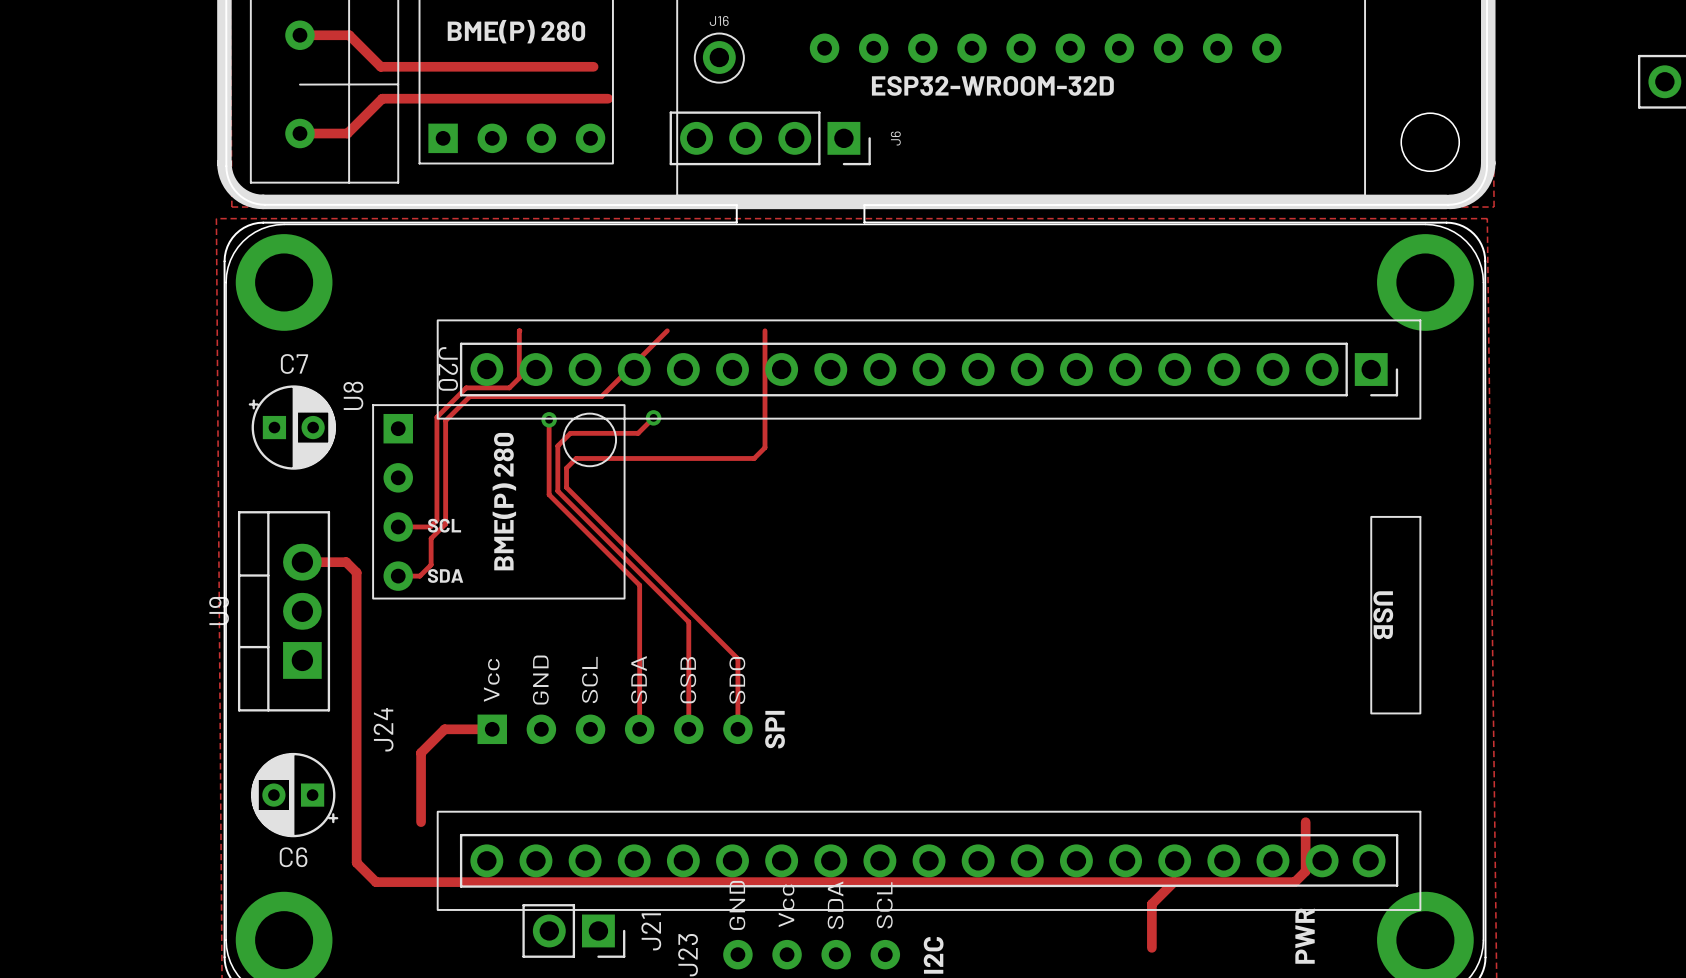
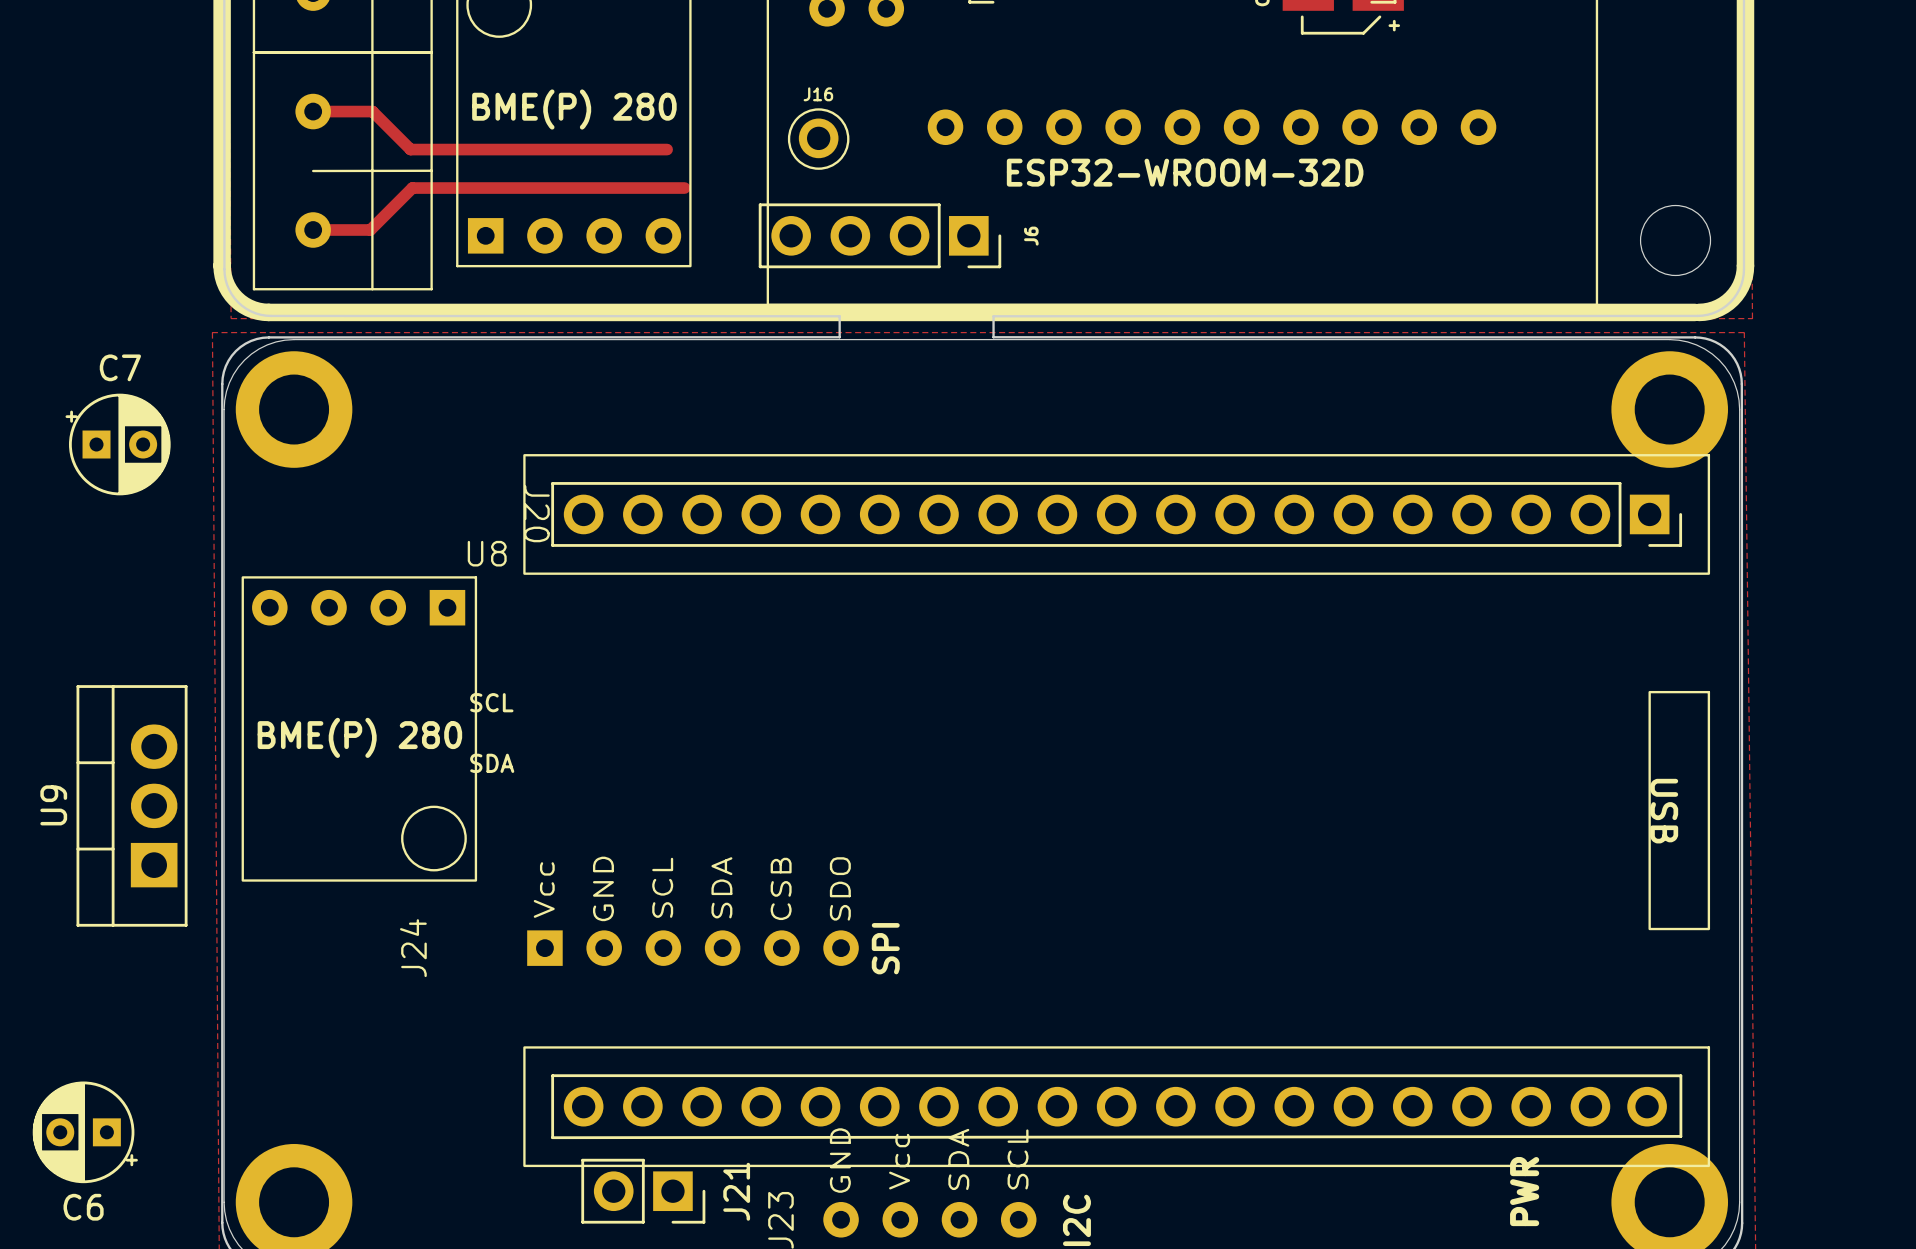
track: (519, 330) (519, 378) (509, 387) (466, 387) (436, 417) (436, 520) (430, 526) (398, 526) -> none
track: (667, 330) (601, 396) (469, 396) (445, 420) (445, 524) (431, 538) (431, 564) (419, 576) (398, 576) -> none
track: (765, 330) (765, 447) (754, 458) (576, 458) (566, 468) (566, 487) (737, 658) (737, 729) -> none
track: (653, 417) (638, 433) (570, 433) (557, 445) (557, 491) (688, 622) (688, 729) -> none
via: (653, 417) -> none
track: (549, 419) (549, 494) (639, 585) (639, 729) -> none
via: (549, 419) -> none
C7 position: (292, 427) -> (118, 444)
U8 rotation: 0° (498, 501) -> 90° clockwise (359, 728)
U8 position: (498, 501) -> (359, 728)
track: (302, 562) (346, 562) (356, 572) (356, 862) (375, 882) (1294, 882) (1305, 871) (1305, 822) -> none
U9 position: (284, 611) -> (132, 805)
J20 position: (929, 615) -> (1116, 810)
track: (492, 729) (444, 729) (421, 752) (421, 822) -> none
C6 position: (294, 795) -> (85, 1132)
track: (1173, 882) (1151, 904) (1151, 947) -> none

